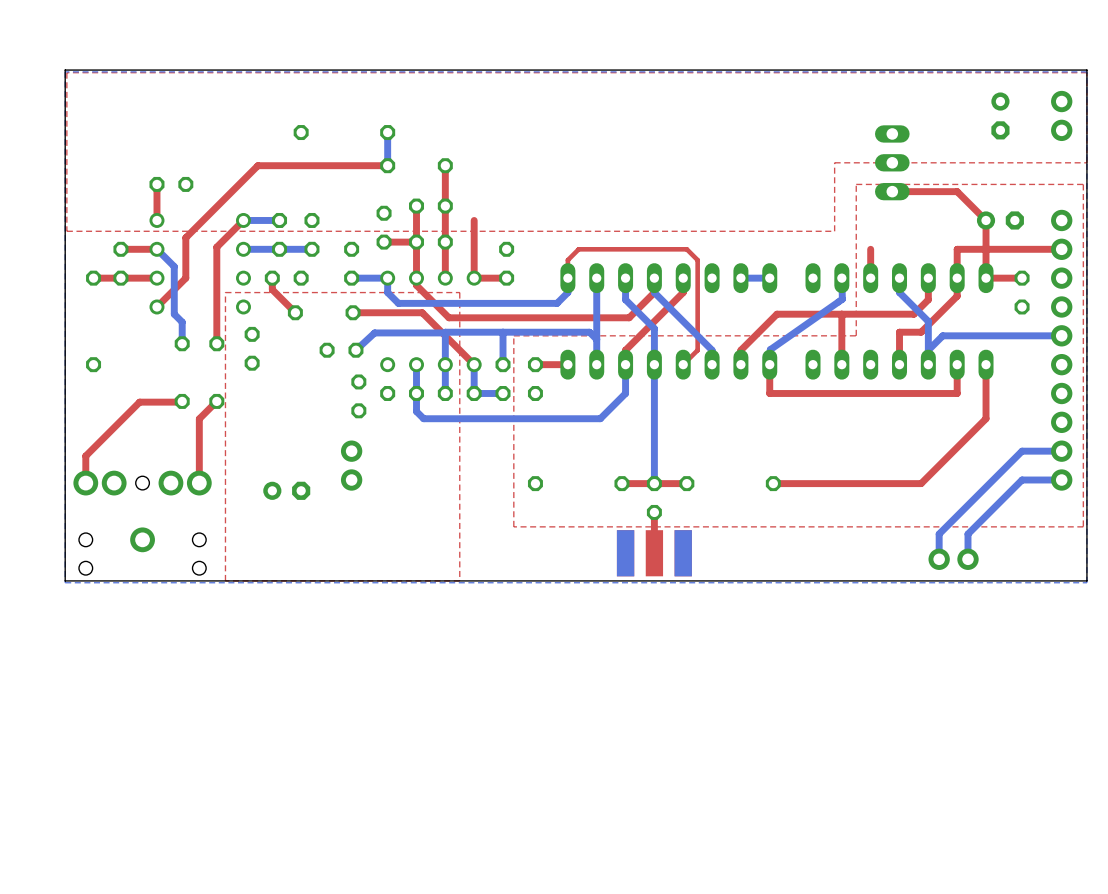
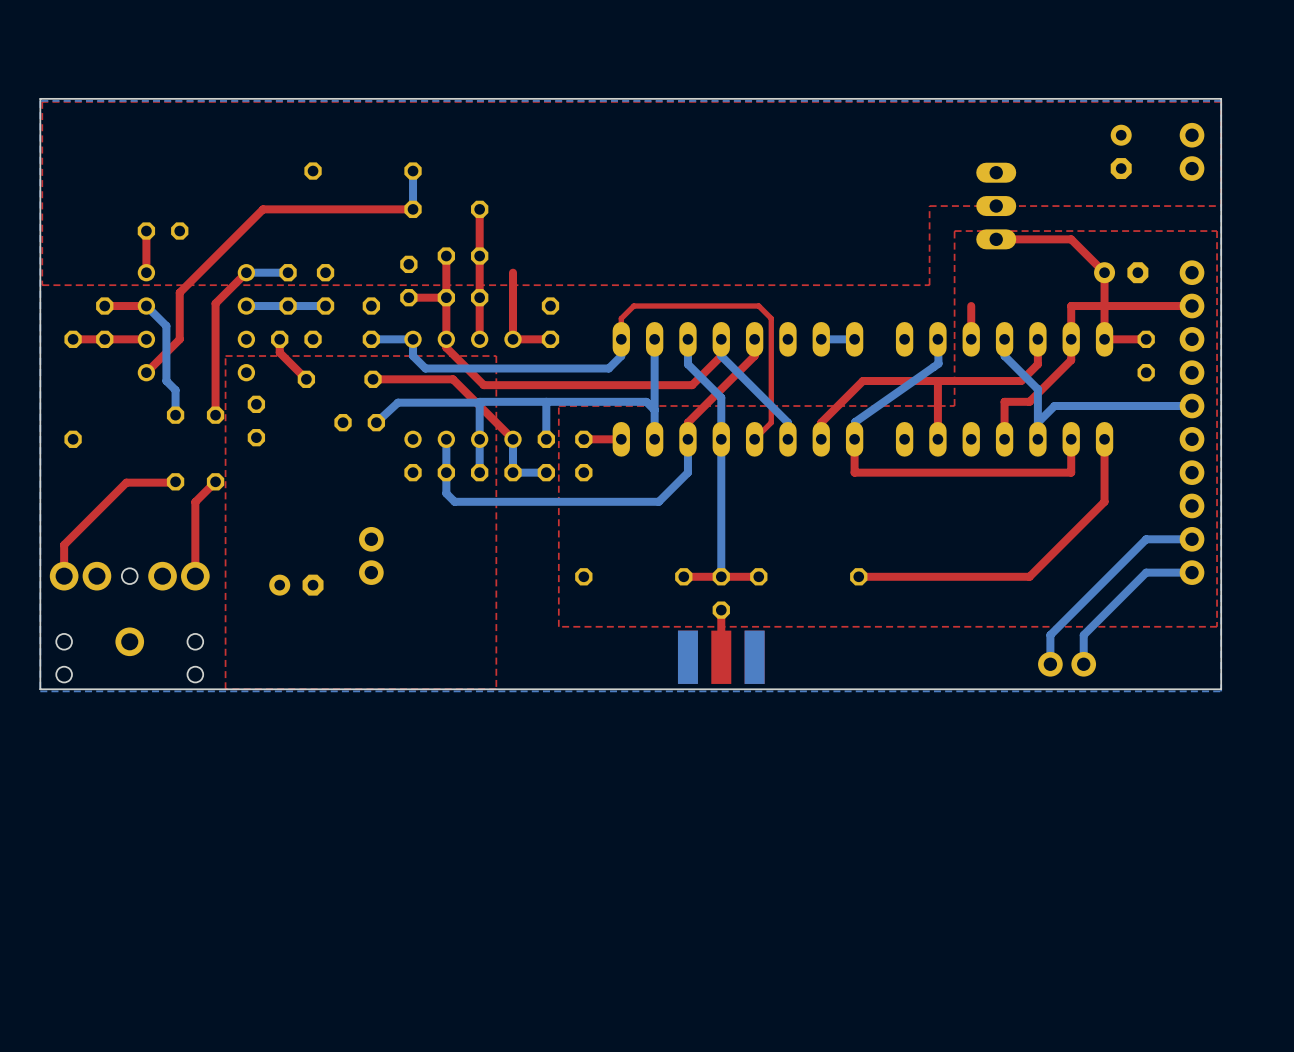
part: (358, 396) -> none

